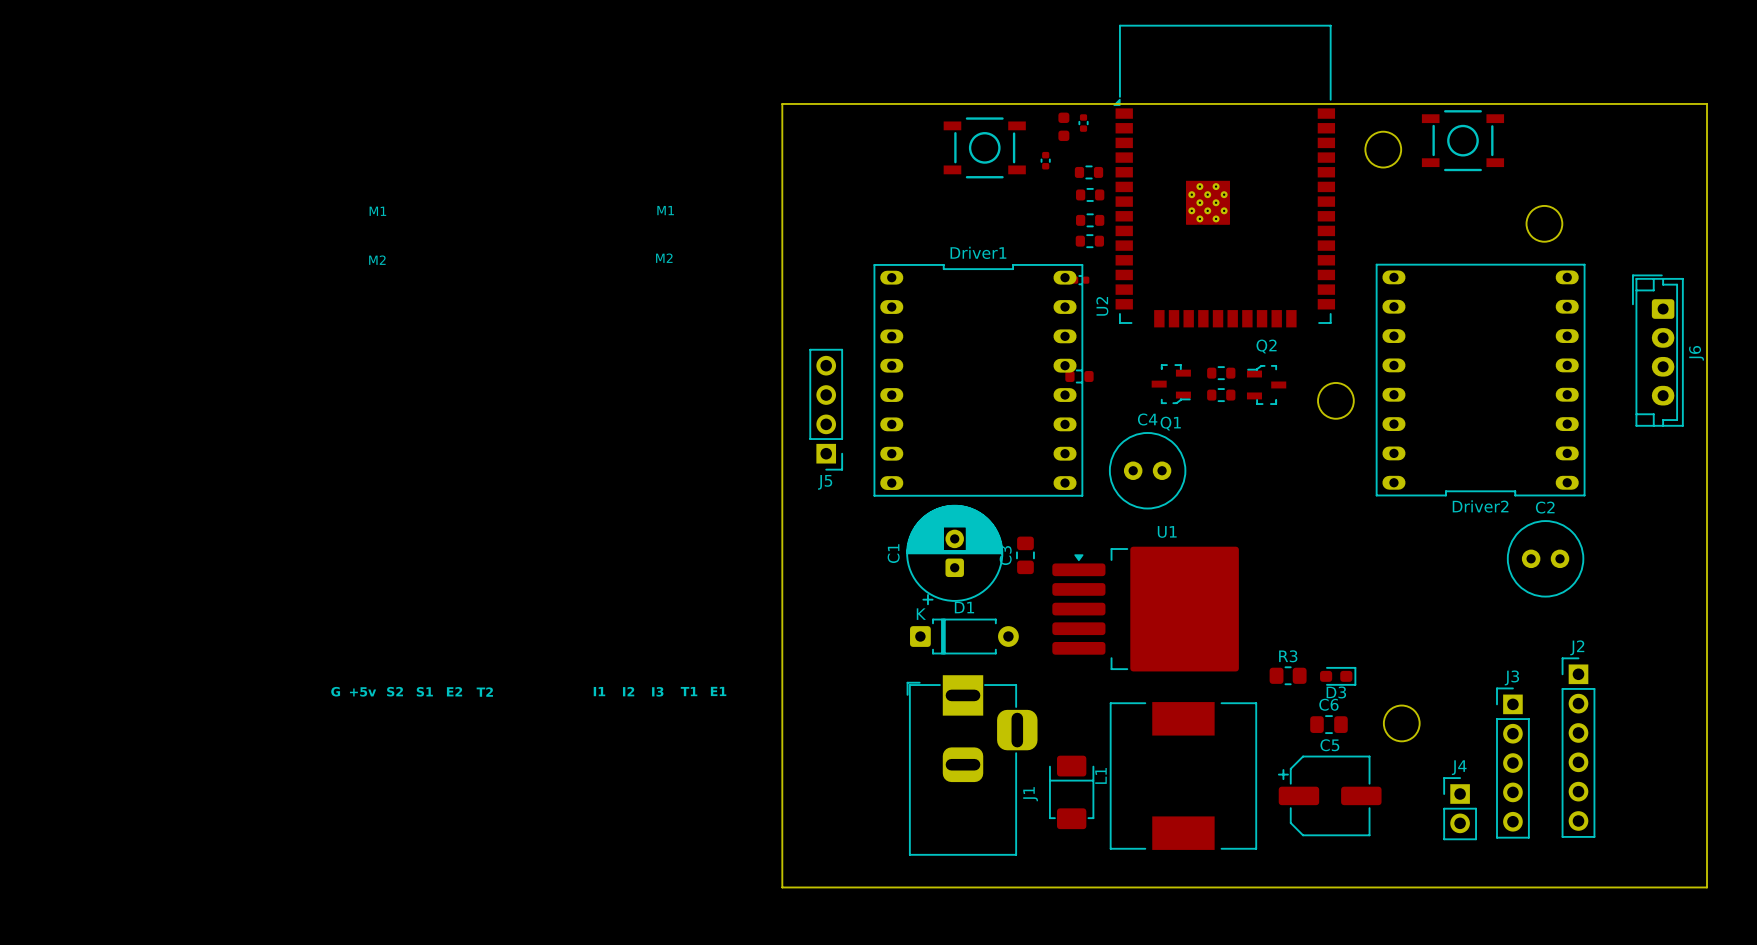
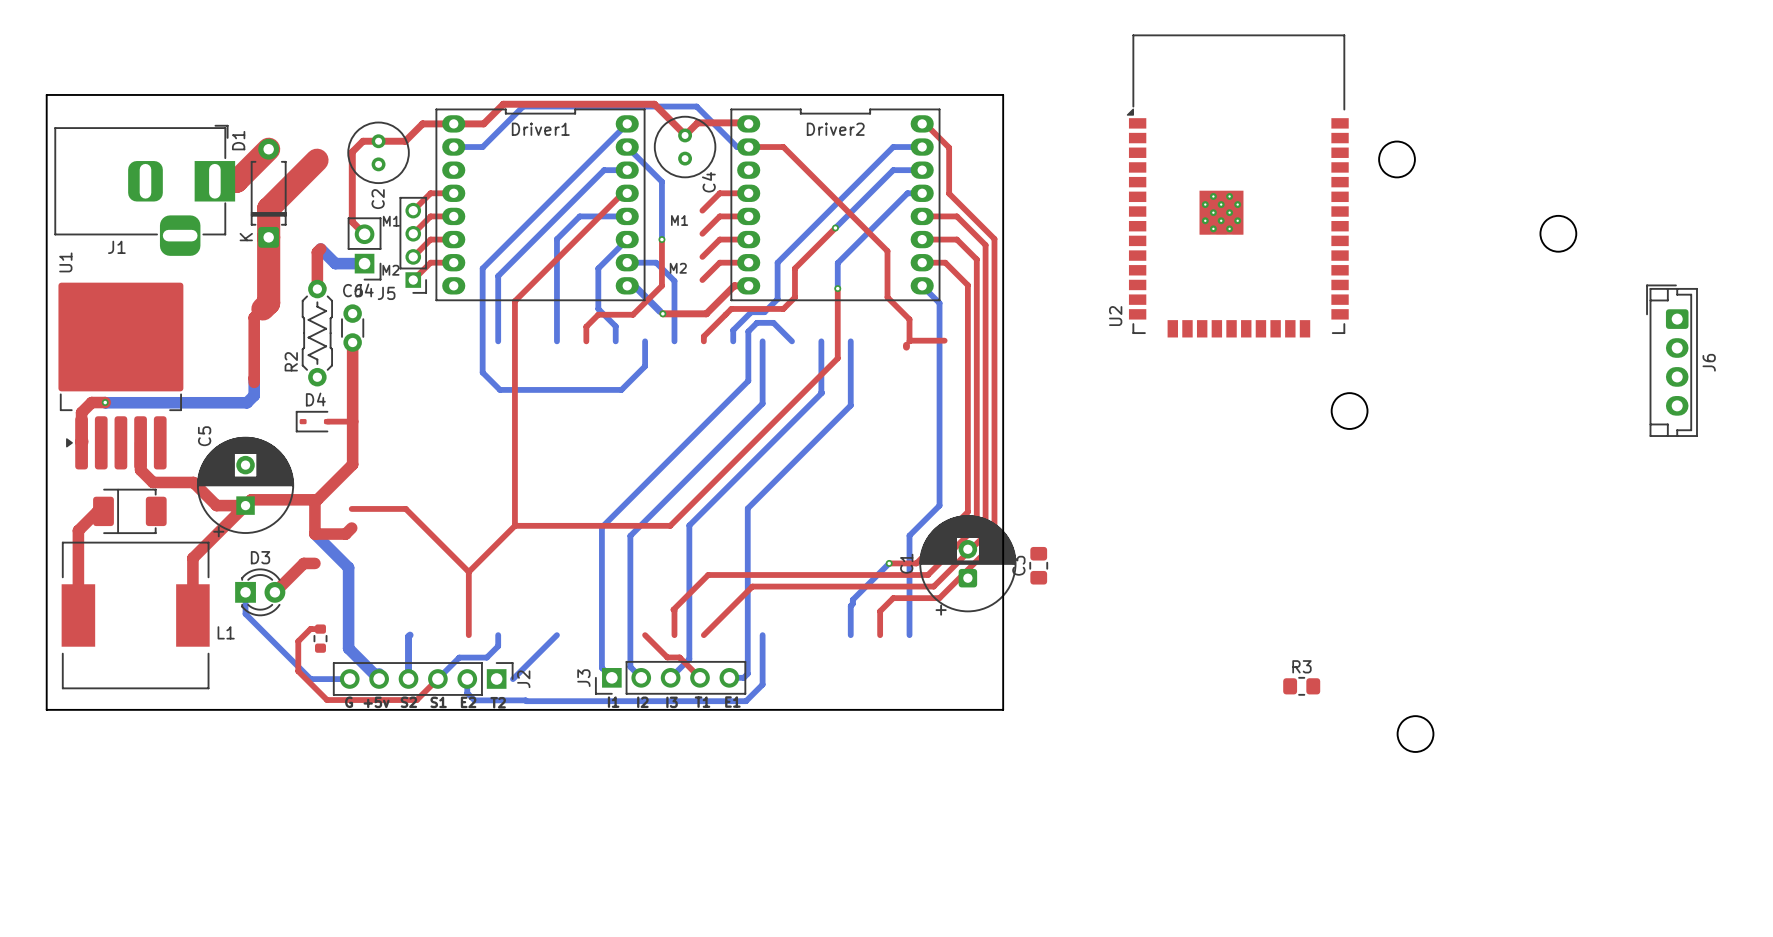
board edge: none -> (46, 94) (1003, 94) (1003, 709) (46, 709) (46, 94)
board edge: (782, 103) (1707, 103) (1707, 887) (782, 887) (782, 103) -> none
bottom track: none -> (627, 123) (482, 268) (482, 372) (500, 389) (621, 389) (645, 366) (645, 341)
top track: none -> (748, 123) (697, 122) (685, 135) (654, 104) (503, 104) (483, 123) (422, 123) (405, 141) (363, 141) (352, 152) (352, 221) (364, 234)
top track: none -> (922, 123) (925, 123) (949, 147) (949, 193) (994, 238) (994, 543) (939, 598) (893, 598) (880, 611) (880, 635)
part: (1083, 123) -> none
part: (1063, 126) -> none
bottom track: none -> (453, 147) (482, 147) (523, 106) (696, 106) (737, 147) (748, 147)
bottom track: none -> (627, 147) (661, 181) (661, 239)
top track: none -> (748, 147) (783, 147) (887, 251) (887, 297) (909, 319) (909, 341) (944, 340)
bottom track: none -> (922, 147) (893, 147) (777, 262) (777, 299) (764, 312) (751, 312) (733, 330) (733, 341)
top track: none -> (268, 149) (236, 181) (214, 181) (216, 183)
part: (1462, 140) -> none
part: (984, 147) -> none
top track: none -> (317, 160) (268, 208) (268, 303) (254, 317) (254, 382)
bottom track: none -> (627, 170) (604, 170) (498, 276) (498, 341)
bottom track: none -> (922, 170) (893, 170) (835, 227)
part: (1045, 160) -> none
part: (1089, 172) -> none
top track: none -> (453, 193) (430, 193) (413, 210)
top track: none -> (627, 193) (622, 193) (514, 301) (514, 525)
top track: none -> (748, 193) (719, 193) (702, 210)
bottom track: none -> (922, 193) (907, 193) (837, 263) (837, 288)
part: (1090, 194) -> none
top track: none -> (453, 216) (430, 216) (413, 233)
bottom track: none -> (627, 216) (579, 216) (556, 239) (556, 341)
top track: none -> (748, 216) (719, 216) (702, 233)
top track: none -> (922, 216) (956, 216) (985, 245) (985, 534) (933, 586) (752, 586) (703, 635)
top track: none -> (835, 227) (794, 268) (794, 297) (783, 308) (731, 308) (703, 336) (703, 341)
via: none -> (835, 227)
part: (1090, 220) -> none
top track: none -> (453, 239) (430, 239) (413, 256)
bottom track: none -> (627, 239) (598, 268) (598, 308) (615, 326) (615, 341)
top track: none -> (661, 239) (661, 285) (633, 314) (598, 314) (586, 326) (586, 341)
via: none -> (661, 239)
top track: none -> (748, 239) (719, 239) (702, 256)
top track: none -> (922, 239) (956, 239) (976, 259) (976, 526) (927, 575) (708, 575) (673, 609) (674, 635)
top track: none -> (320, 248) (317, 252) (317, 284) (320, 288)
bottom track: none -> (320, 248) (335, 263) (364, 263)
part: (1089, 241) -> none
top track: none -> (453, 262) (430, 262) (413, 280)
bottom track: none -> (627, 262) (656, 262) (674, 281) (674, 341)
top track: none -> (748, 262) (719, 262) (702, 280)
top track: none -> (922, 262) (945, 262) (967, 285) (967, 511) (916, 563) (889, 563)
Driver1 name position: Driver1 (978, 252) -> Driver1 (540, 129)
Driver2 footprint: [1375, 263, 1586, 497] -> [730, 108, 941, 301]
Driver1 footprint: [873, 264, 1084, 497] -> [435, 108, 646, 301]
bottom track: none -> (627, 285) (634, 285) (660, 311)
top track: none -> (748, 285) (734, 285) (706, 313) (662, 313)
bottom track: none -> (922, 285) (939, 303) (939, 505) (909, 535) (909, 635)
top track: none -> (837, 288) (837, 358) (670, 525) (514, 525)
via: none -> (837, 288)
part: (1080, 280) -> none
via: none -> (662, 313)
R2: none -> (317, 333)
bottom track: none -> (762, 341) (762, 403) (630, 535) (630, 666) (641, 677)
bottom track: none -> (791, 341) (773, 322) (757, 322) (748, 331) (748, 380) (601, 527) (601, 667) (611, 677)
bottom track: none -> (821, 341) (821, 392) (689, 525) (689, 659) (670, 677)
bottom track: none -> (850, 341) (850, 405) (747, 508) (747, 673) (743, 677) (729, 677)
top track: none -> (352, 345) (352, 464) (317, 499) (251, 499) (192, 558) (192, 615)
top track: none -> (906, 345) (906, 347)
J5 footprint: [809, 349, 843, 471] -> [399, 197, 427, 294]
bottom track: none -> (254, 378) (254, 395) (247, 402) (105, 402)
part: (1221, 373) -> none
part: (1079, 376) -> none
Q1: (1171, 384) -> none
Q2: (1266, 384) -> none
top track: none -> (105, 402) (91, 402) (81, 412) (81, 442)
via: none -> (105, 402)
part: (1221, 395) -> none
D4: none -> (313, 421)
top track: none -> (327, 421) (352, 421)
C4 name position: C4 (1147, 419) -> C4 (708, 182)
top track: none -> (140, 442) (140, 470) (153, 482) (193, 482) (216, 505) (245, 505)
C4 footprint: [1109, 432, 1187, 510] -> [654, 116, 717, 179]
J5 name position: J5 (825, 482) -> J5 (386, 293)
top track: none -> (314, 499) (314, 534) (345, 534) (351, 528)
top track: none -> (351, 508) (405, 508) (468, 571)
top track: none -> (103, 511) (97, 511) (78, 530) (78, 615)
part: none -> (129, 511)
Driver2 name position: Driver2 (1480, 506) -> Driver2 (835, 129)
C2 name position: C2 (1545, 507) -> C2 (378, 199)
top track: none -> (514, 525) (468, 571)
C2 footprint: [1507, 520, 1585, 598] -> [347, 121, 410, 184]
bottom track: none -> (314, 534) (348, 567) (348, 648) (379, 678) (379, 673)
U1 name position: U1 (1167, 531) -> U1 (65, 262)
top track: none -> (314, 563) (303, 563) (274, 592)
bottom track: none -> (889, 563) (852, 599) (850, 605) (850, 635)
via: none -> (889, 563)
top track: none -> (468, 571) (468, 635)
bottom track: none -> (245, 592) (245, 613) (310, 679) (349, 679)
D1 name position: D1 (964, 607) -> D1 (238, 140)
U1 rotation: 0° (1145, 609) -> 90° counterclockwise (120, 376)
U1 position: (1145, 609) -> (120, 376)
top track: none -> (320, 629) (310, 629) (298, 641) (298, 671) (327, 700) (416, 700) (437, 678)
bottom track: none -> (410, 635) (408, 636) (408, 678)
bottom track: none -> (498, 635) (498, 646) (486, 657) (459, 657) (437, 678)
bottom track: none -> (556, 635) (513, 679)
top track: none -> (645, 635) (667, 657) (679, 657) (700, 677)
bottom track: none -> (762, 635) (762, 684) (746, 701) (474, 700) (467, 693) (467, 678)
part: none -> (320, 638)
D1 rotation: 0° (964, 636) -> 90° counterclockwise (268, 193)
D1 position: (964, 636) -> (268, 193)
D3 footprint: [1320, 667, 1357, 686] -> [235, 568, 286, 617]
D3 name position: D3 (1336, 692) -> D3 (260, 557)
C6 footprint: [1310, 715, 1348, 734] -> [341, 304, 364, 352]
C5 name position: C5 (1329, 745) -> C5 (204, 436)
J2 rotation: 0° (1578, 747) -> 90° clockwise (423, 678)
J2 position: (1578, 747) -> (423, 678)
C5 footprint: [1278, 755, 1382, 837] -> [197, 437, 294, 538]
J3 rotation: 0° (1512, 763) -> 90° counterclockwise (670, 677)
J3 position: (1512, 763) -> (670, 677)
J1 rotation: 0° (972, 765) -> 90° clockwise (144, 190)
J1 position: (972, 765) -> (144, 190)
L1 name position: L1 (1100, 775) -> L1 (226, 632)
L1 rotation: 0° (1183, 775) -> 90° clockwise (135, 615)
L1 position: (1183, 775) -> (135, 615)
part: (1071, 792) -> none
J4 rotation: 0° (1460, 808) -> 180° (364, 248)
J4 position: (1460, 808) -> (364, 248)

